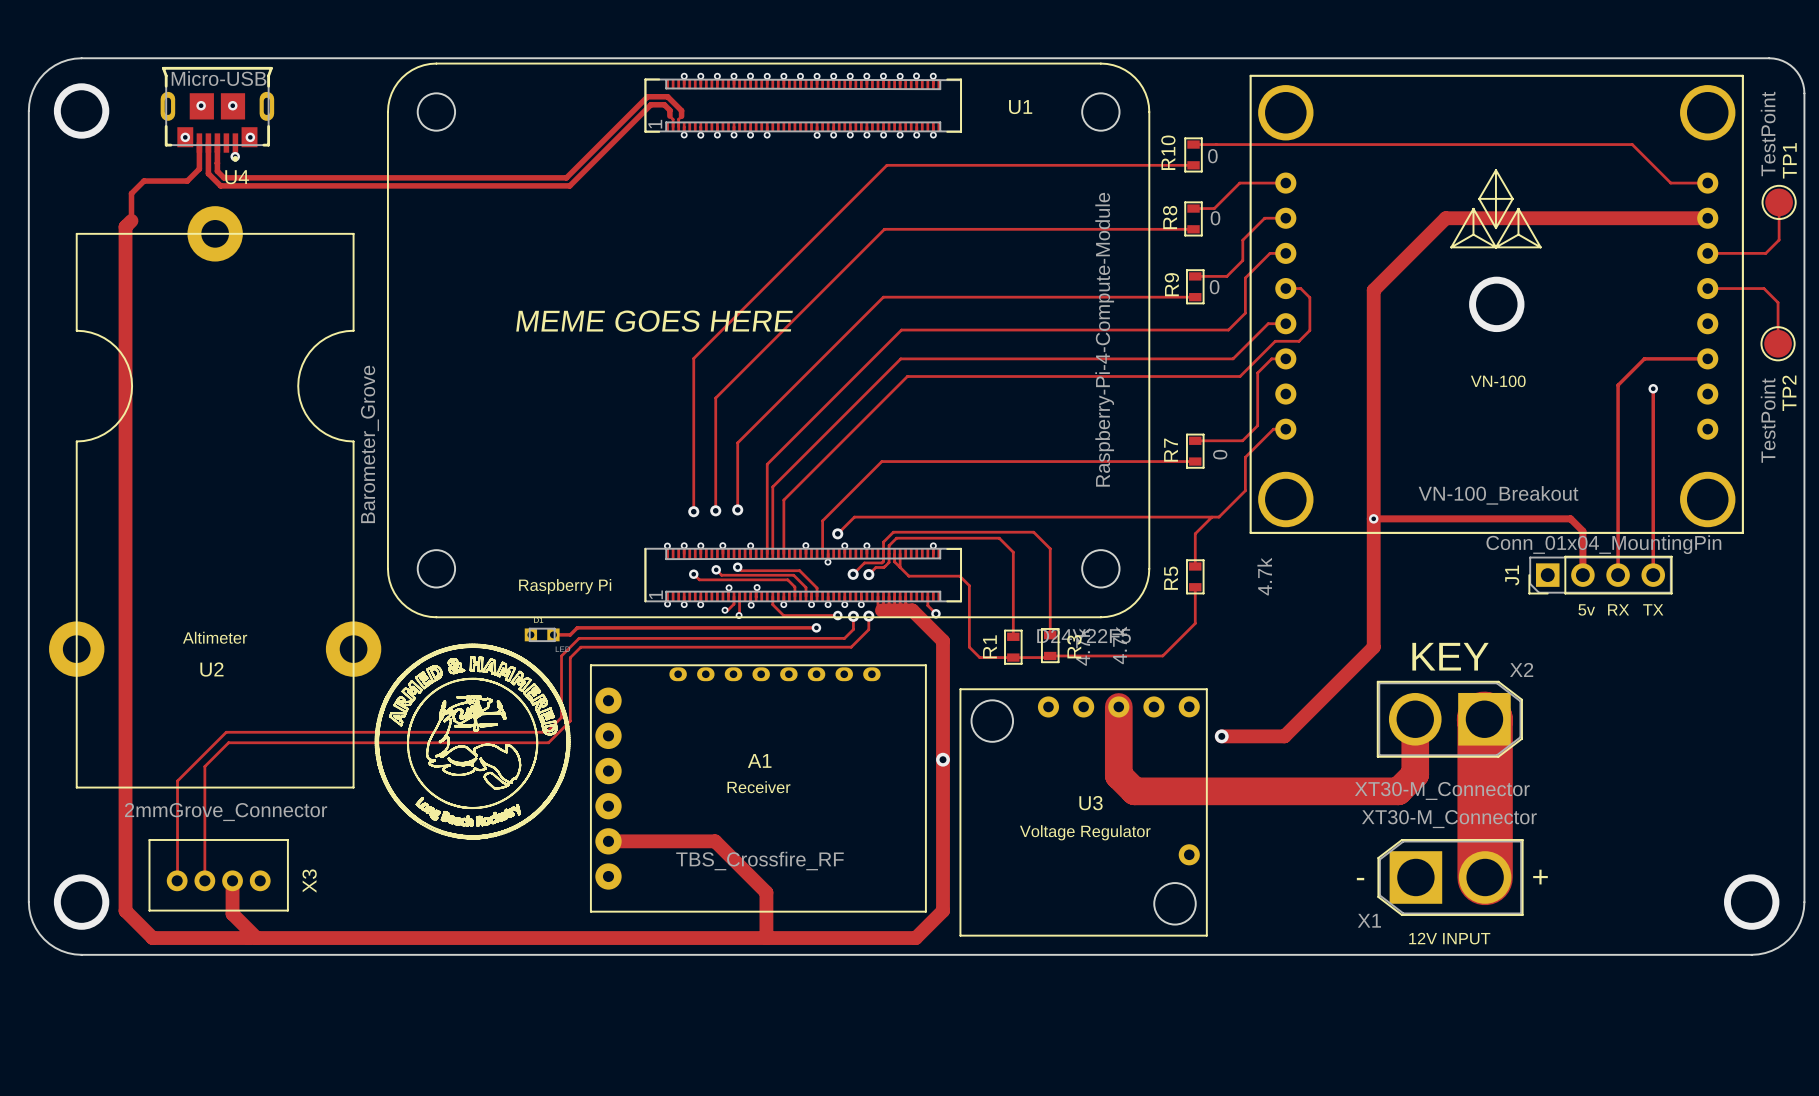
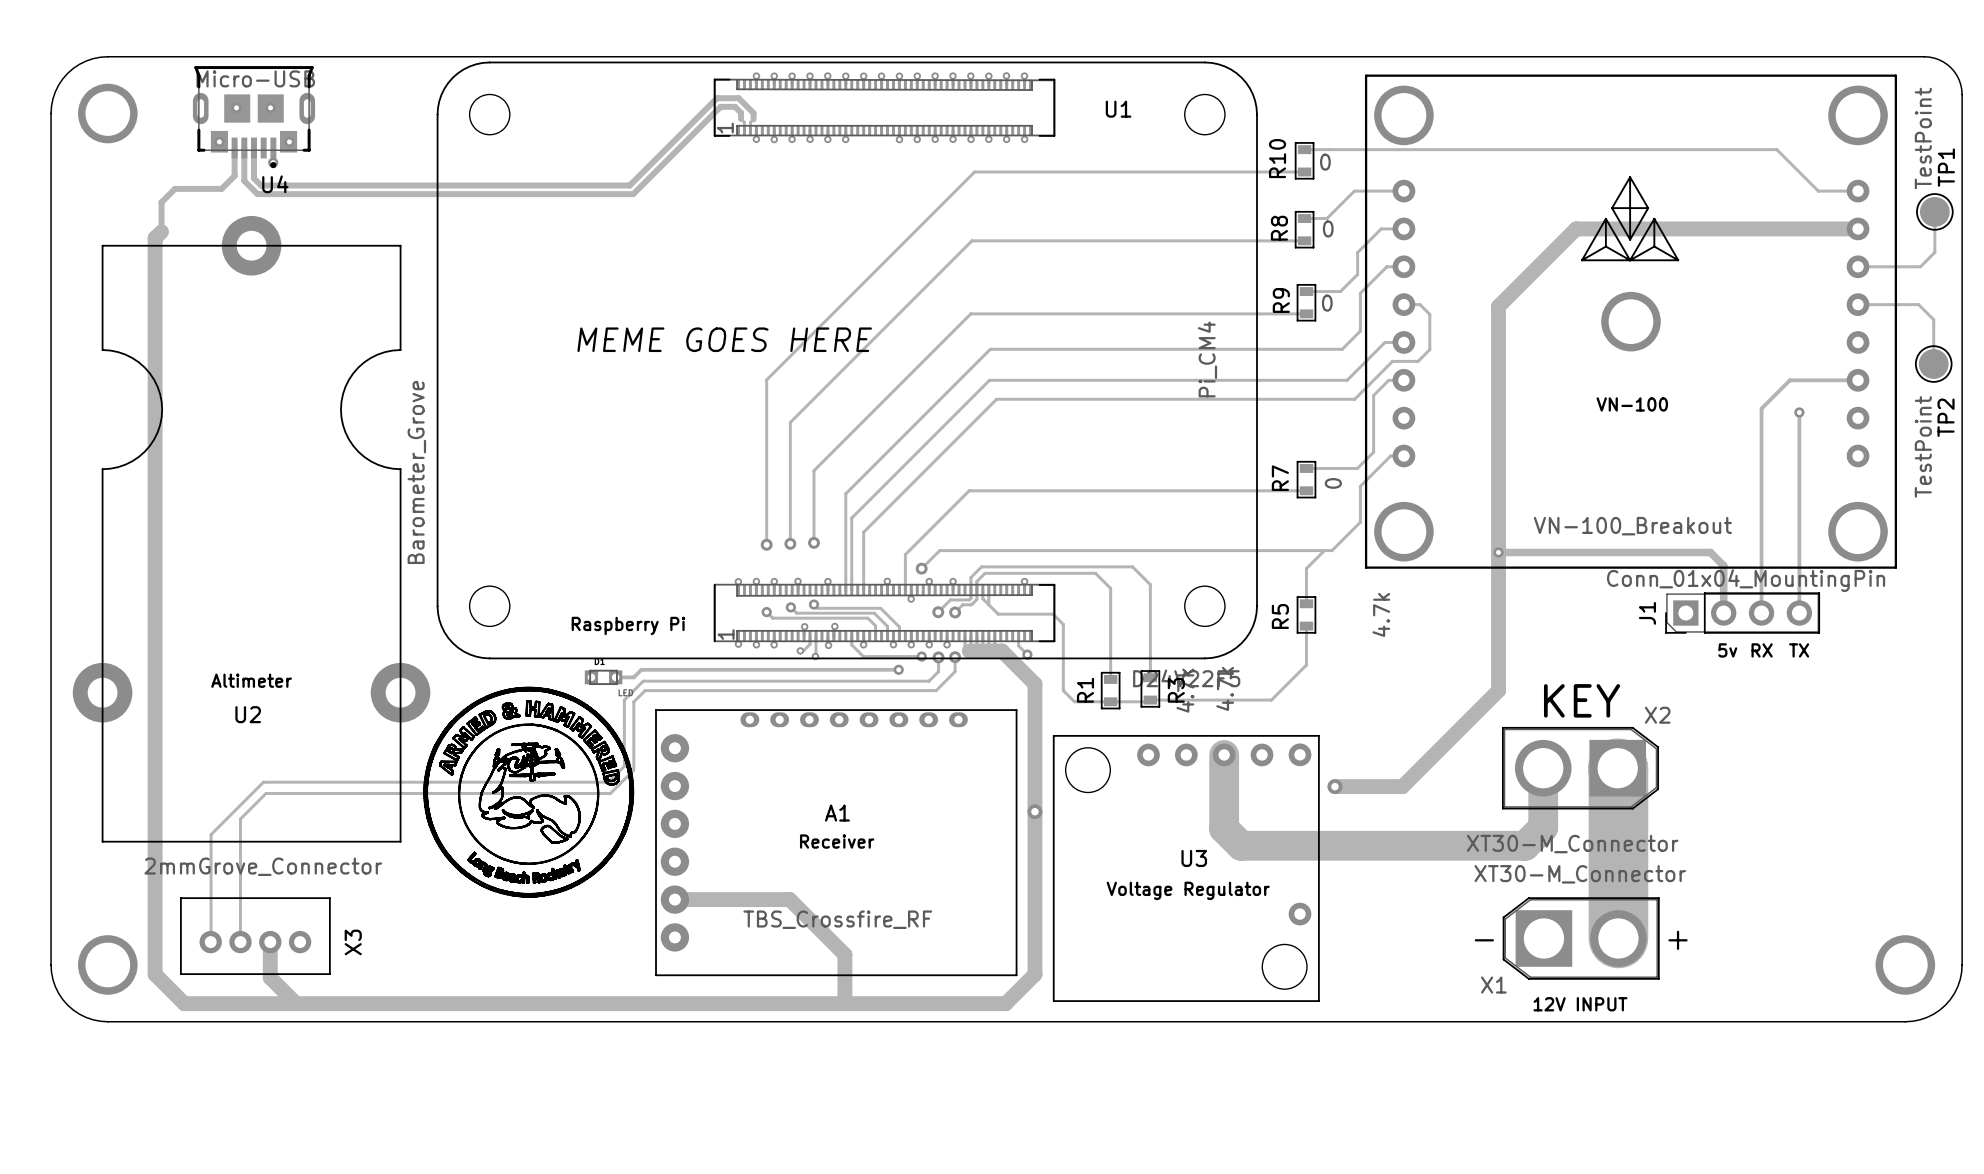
U1 value: Raspberry-Pi-4-Compute-Module (1104, 339) -> Pi_CM4 (1207, 359)

